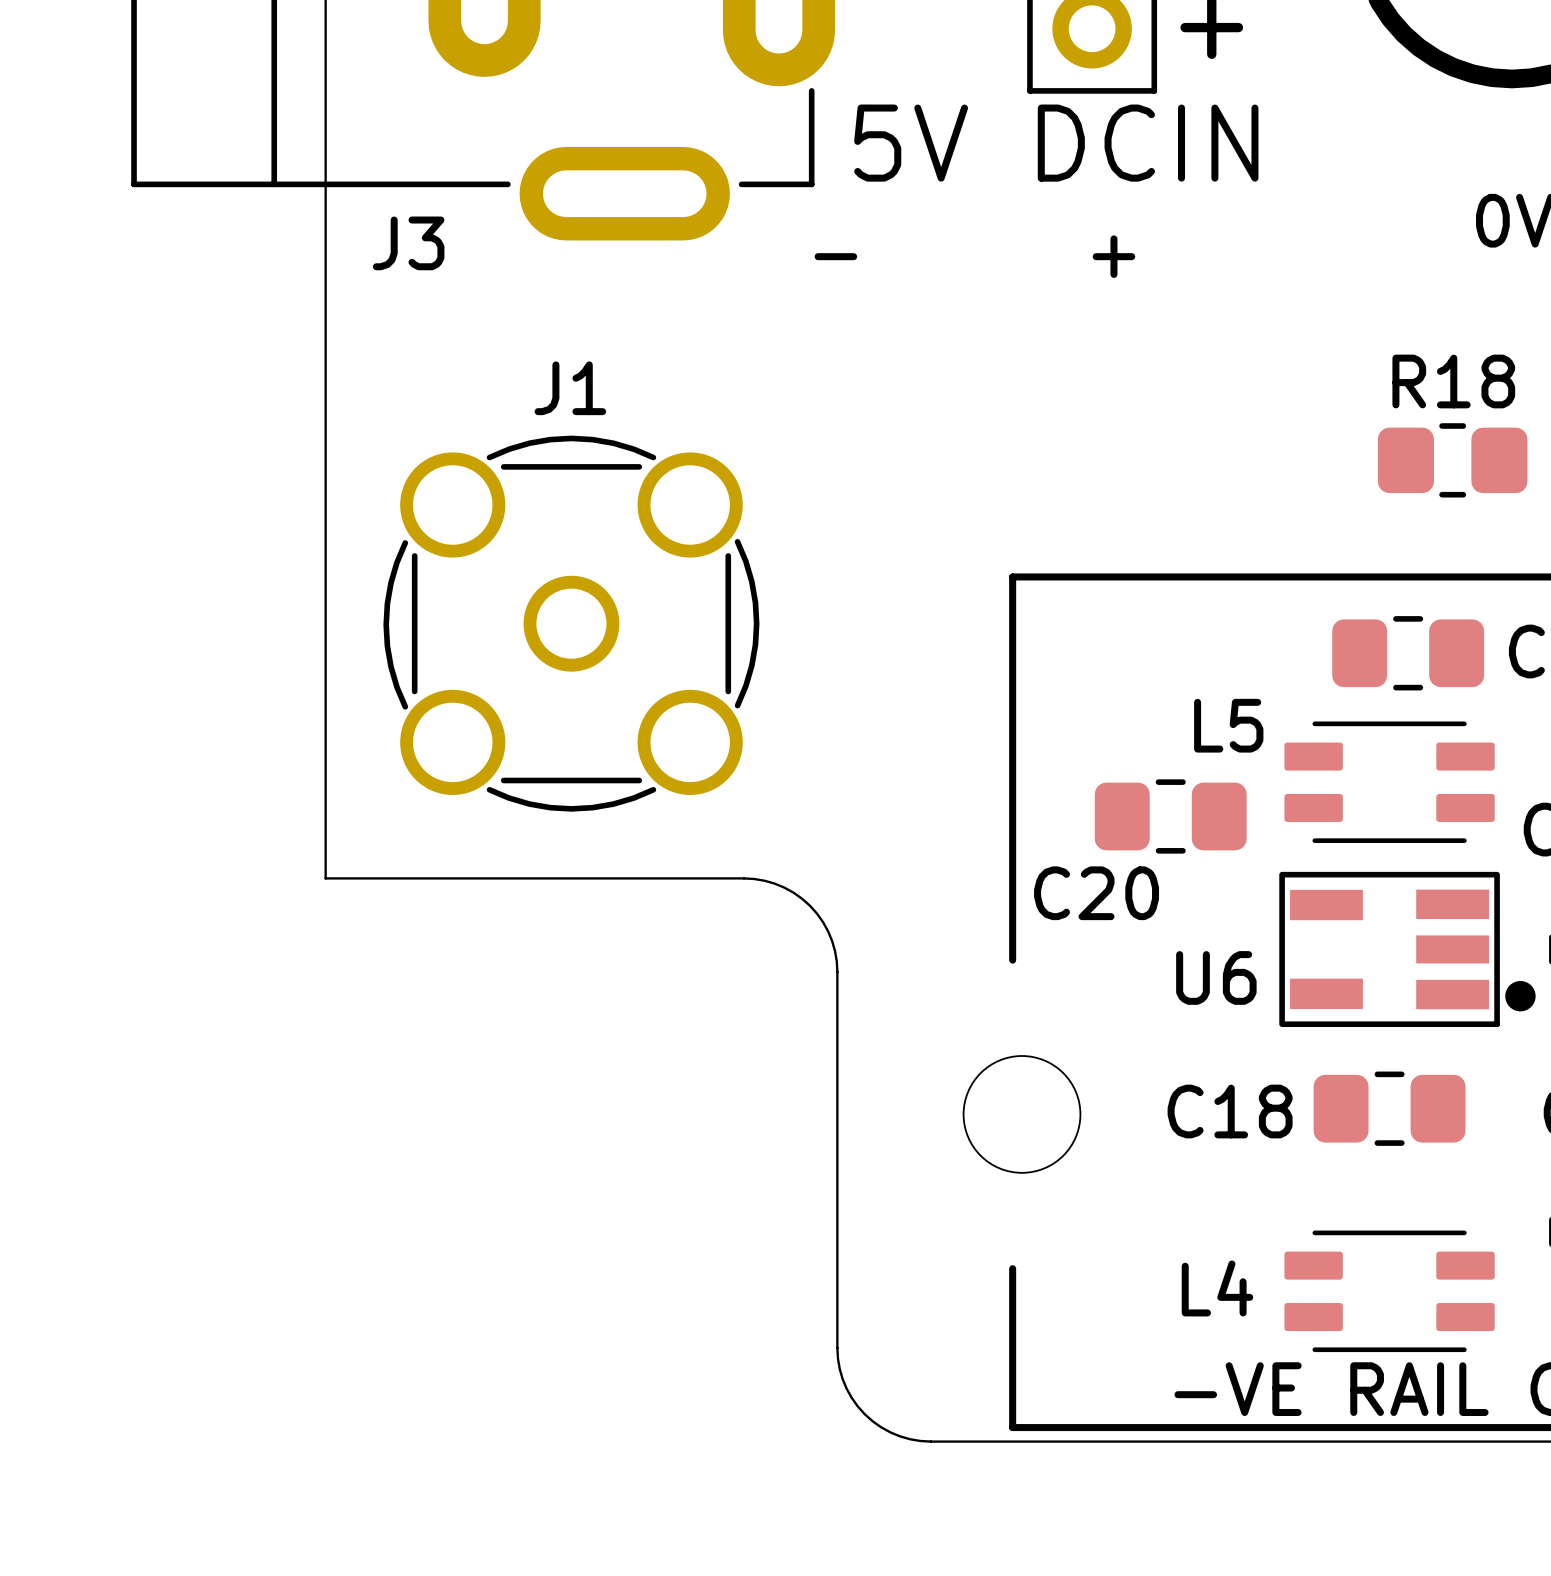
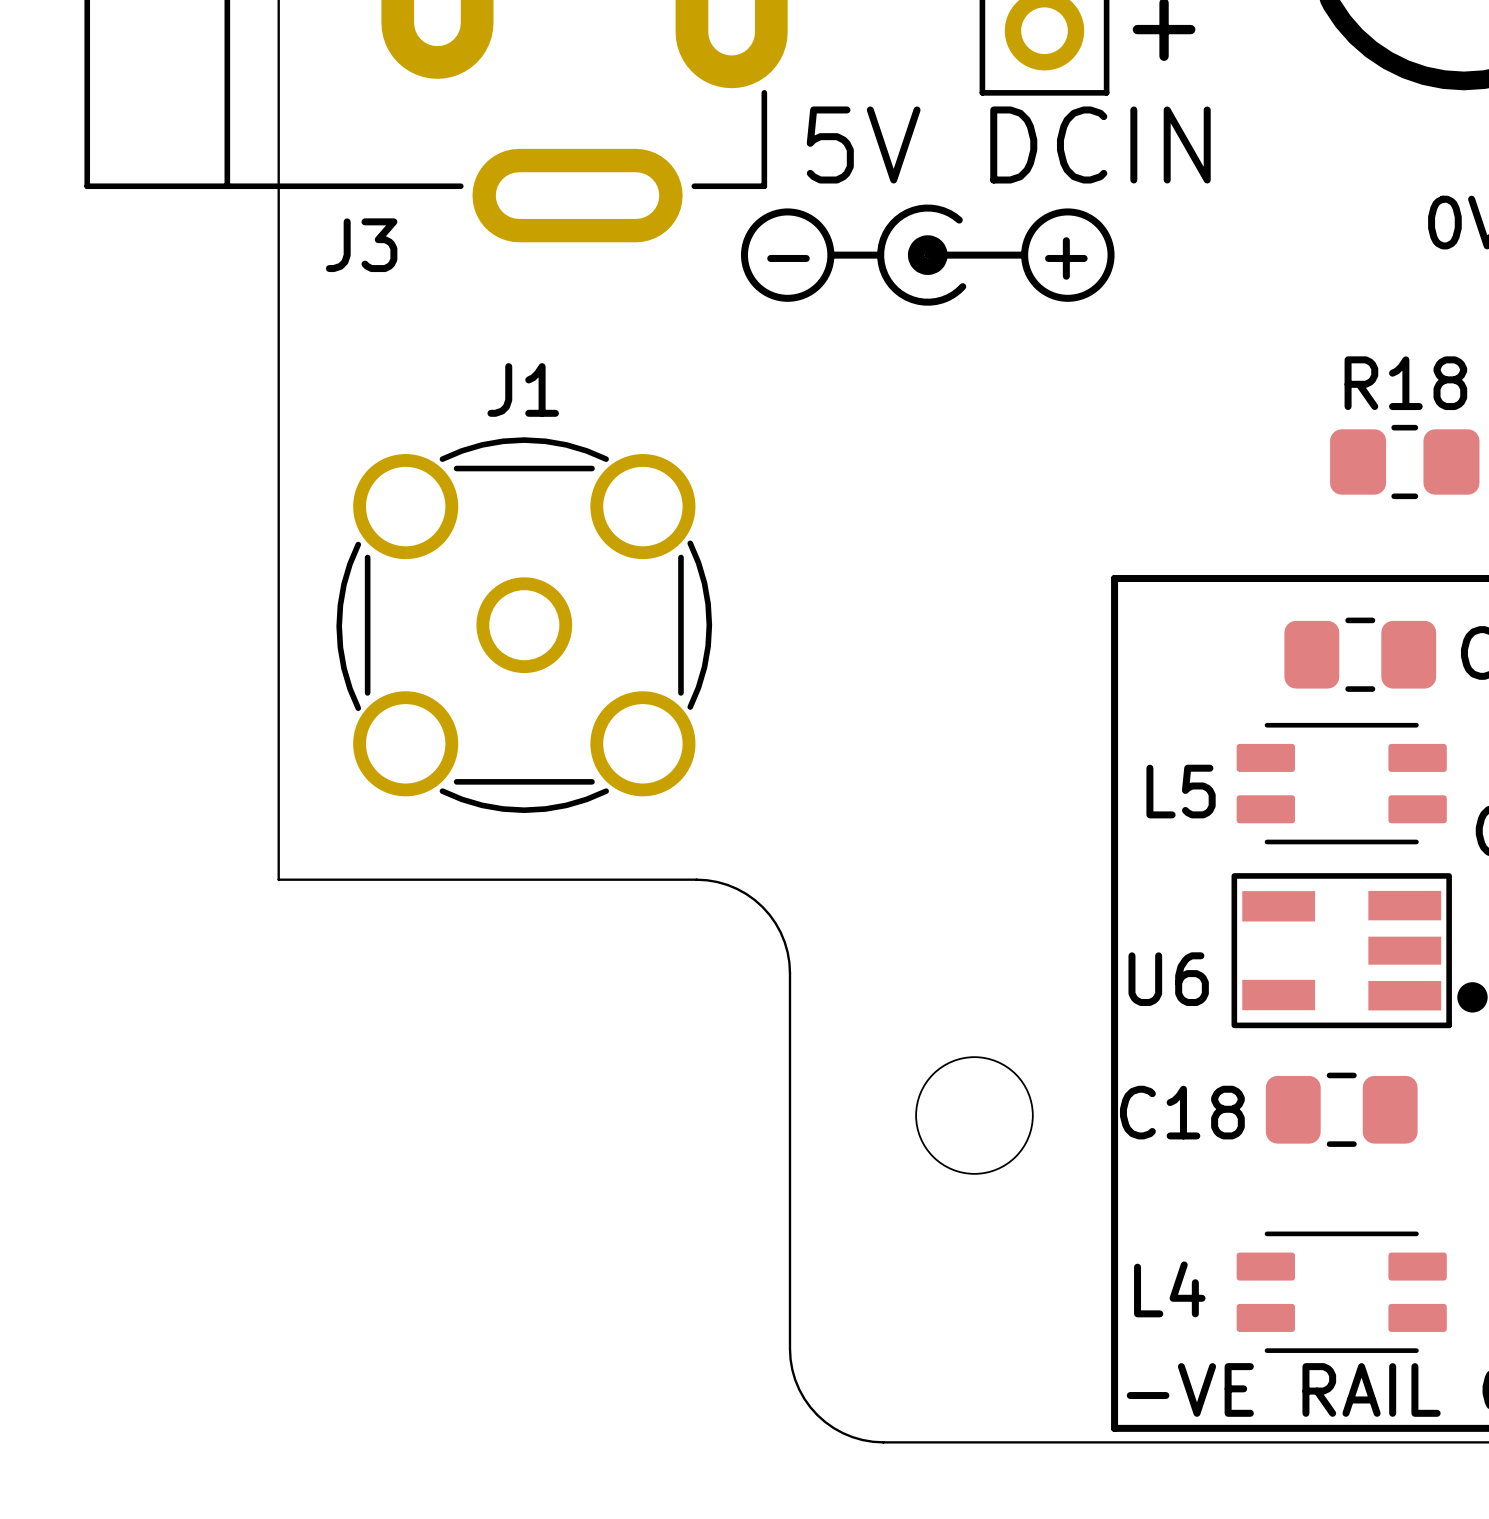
drawing: none -> [740, 204, 1115, 306]
line: (1162, 576) (1012, 576) (1012, 960) -> (1114, 578) (1114, 1428)
L5 name position: L5 (1228, 725) -> L5 (1181, 791)
C20: (1170, 816) -> none
line: (1012, 1268) (1012, 1427) (1162, 1427) -> none

